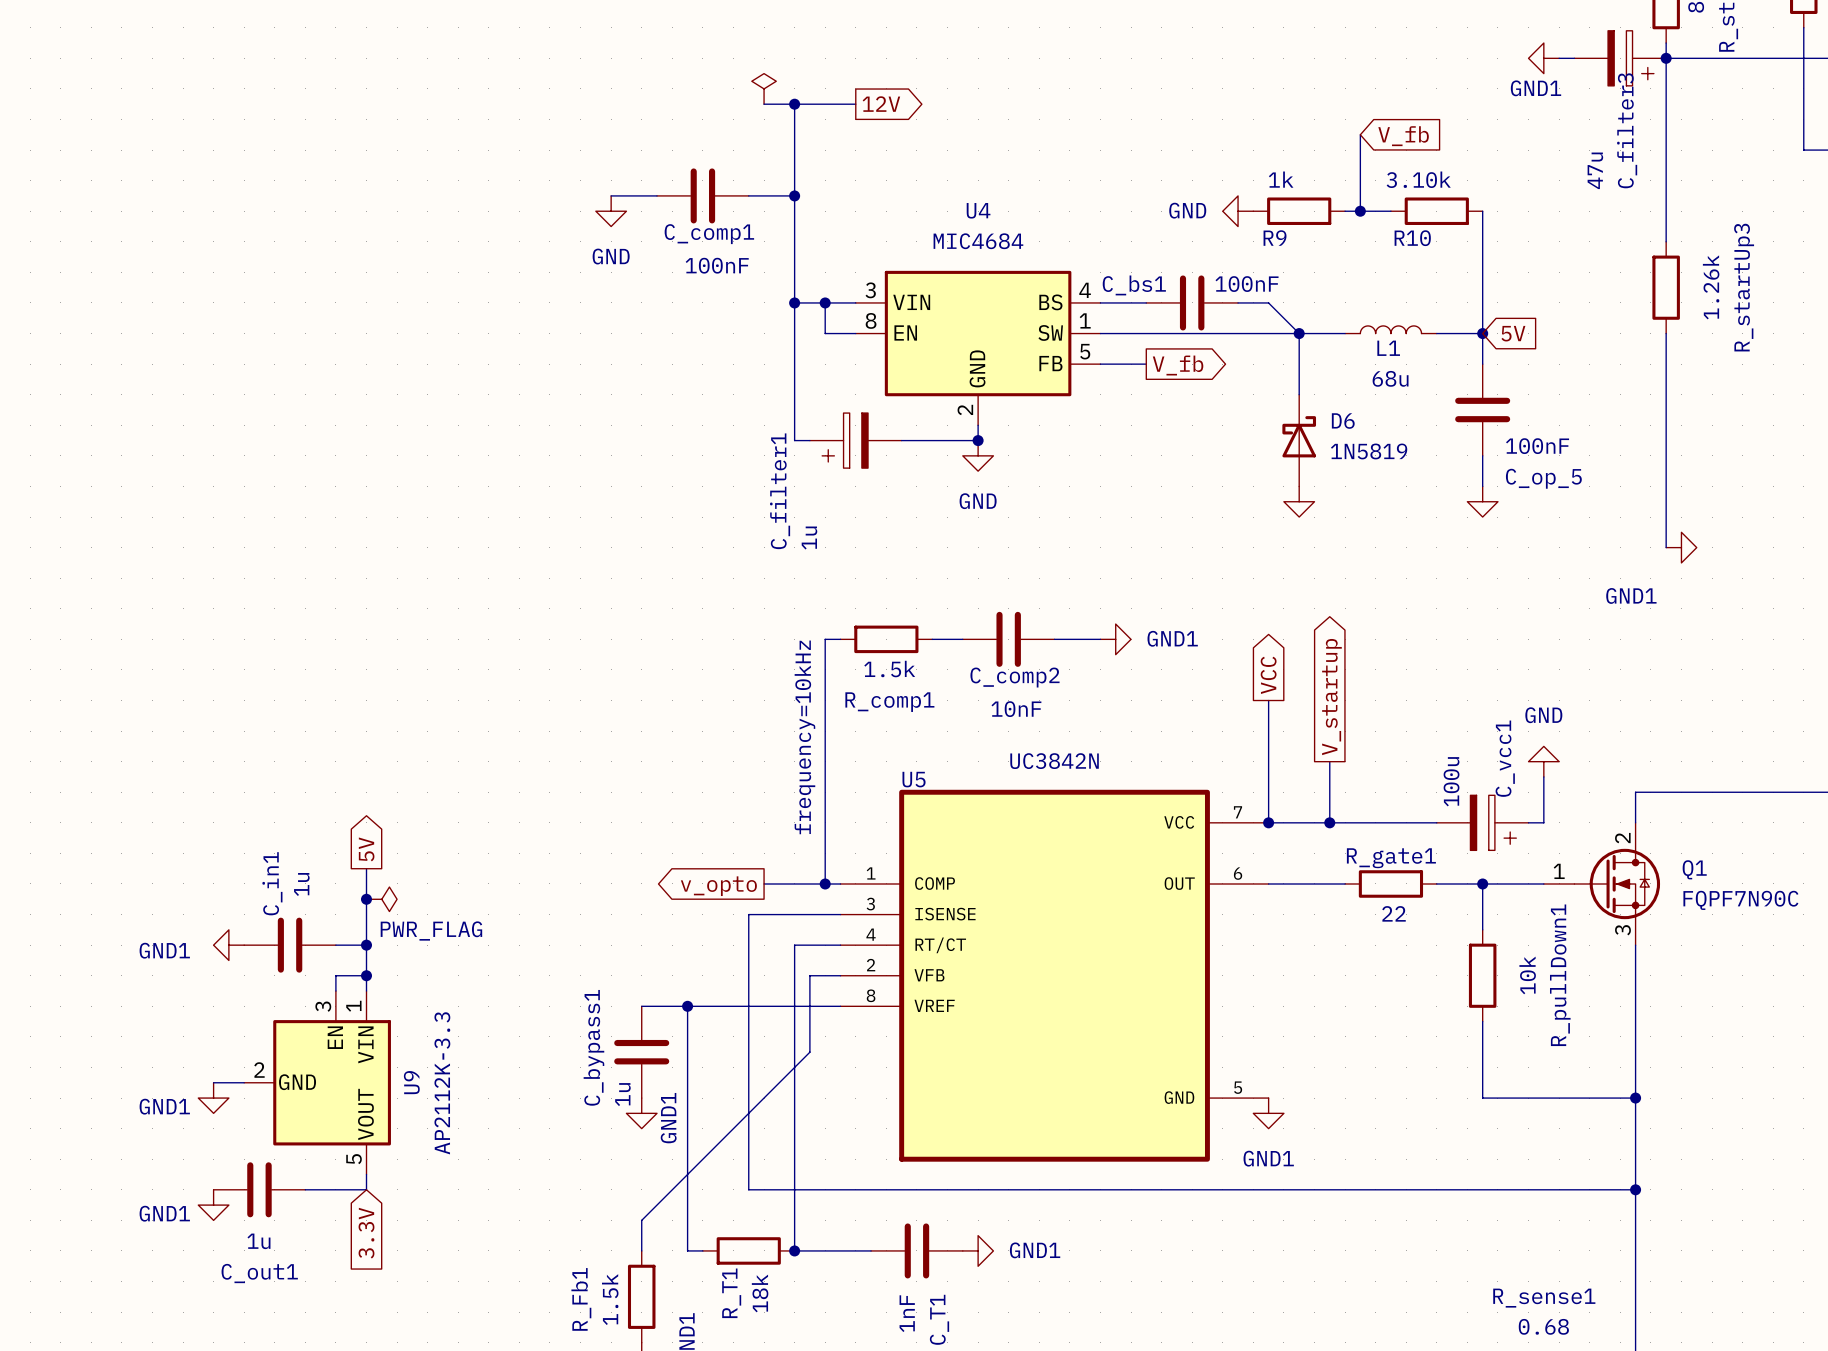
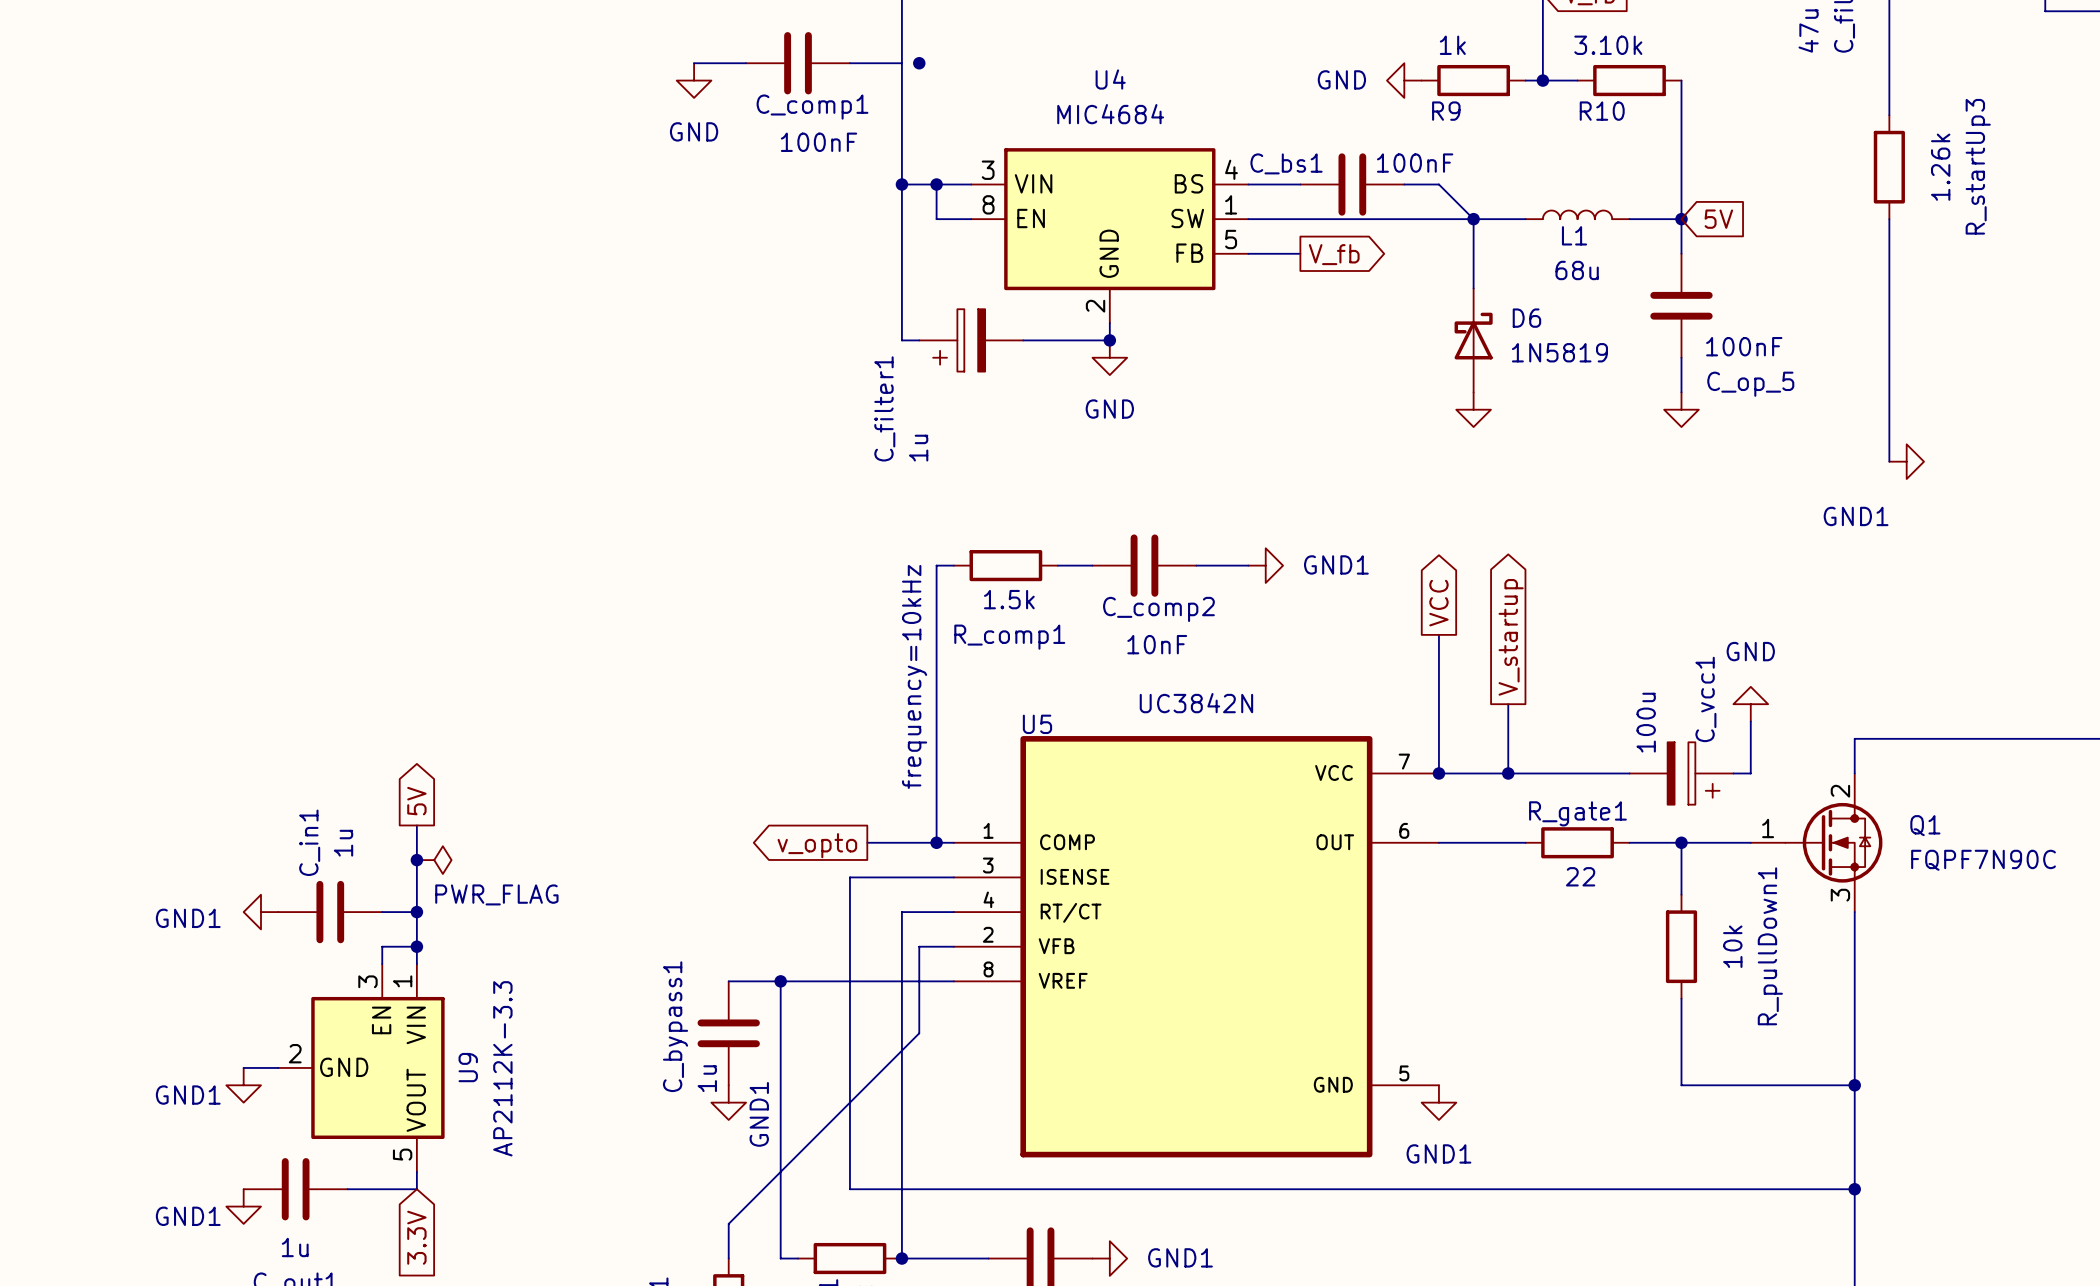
junction position: (794, 195) -> (919, 63)

